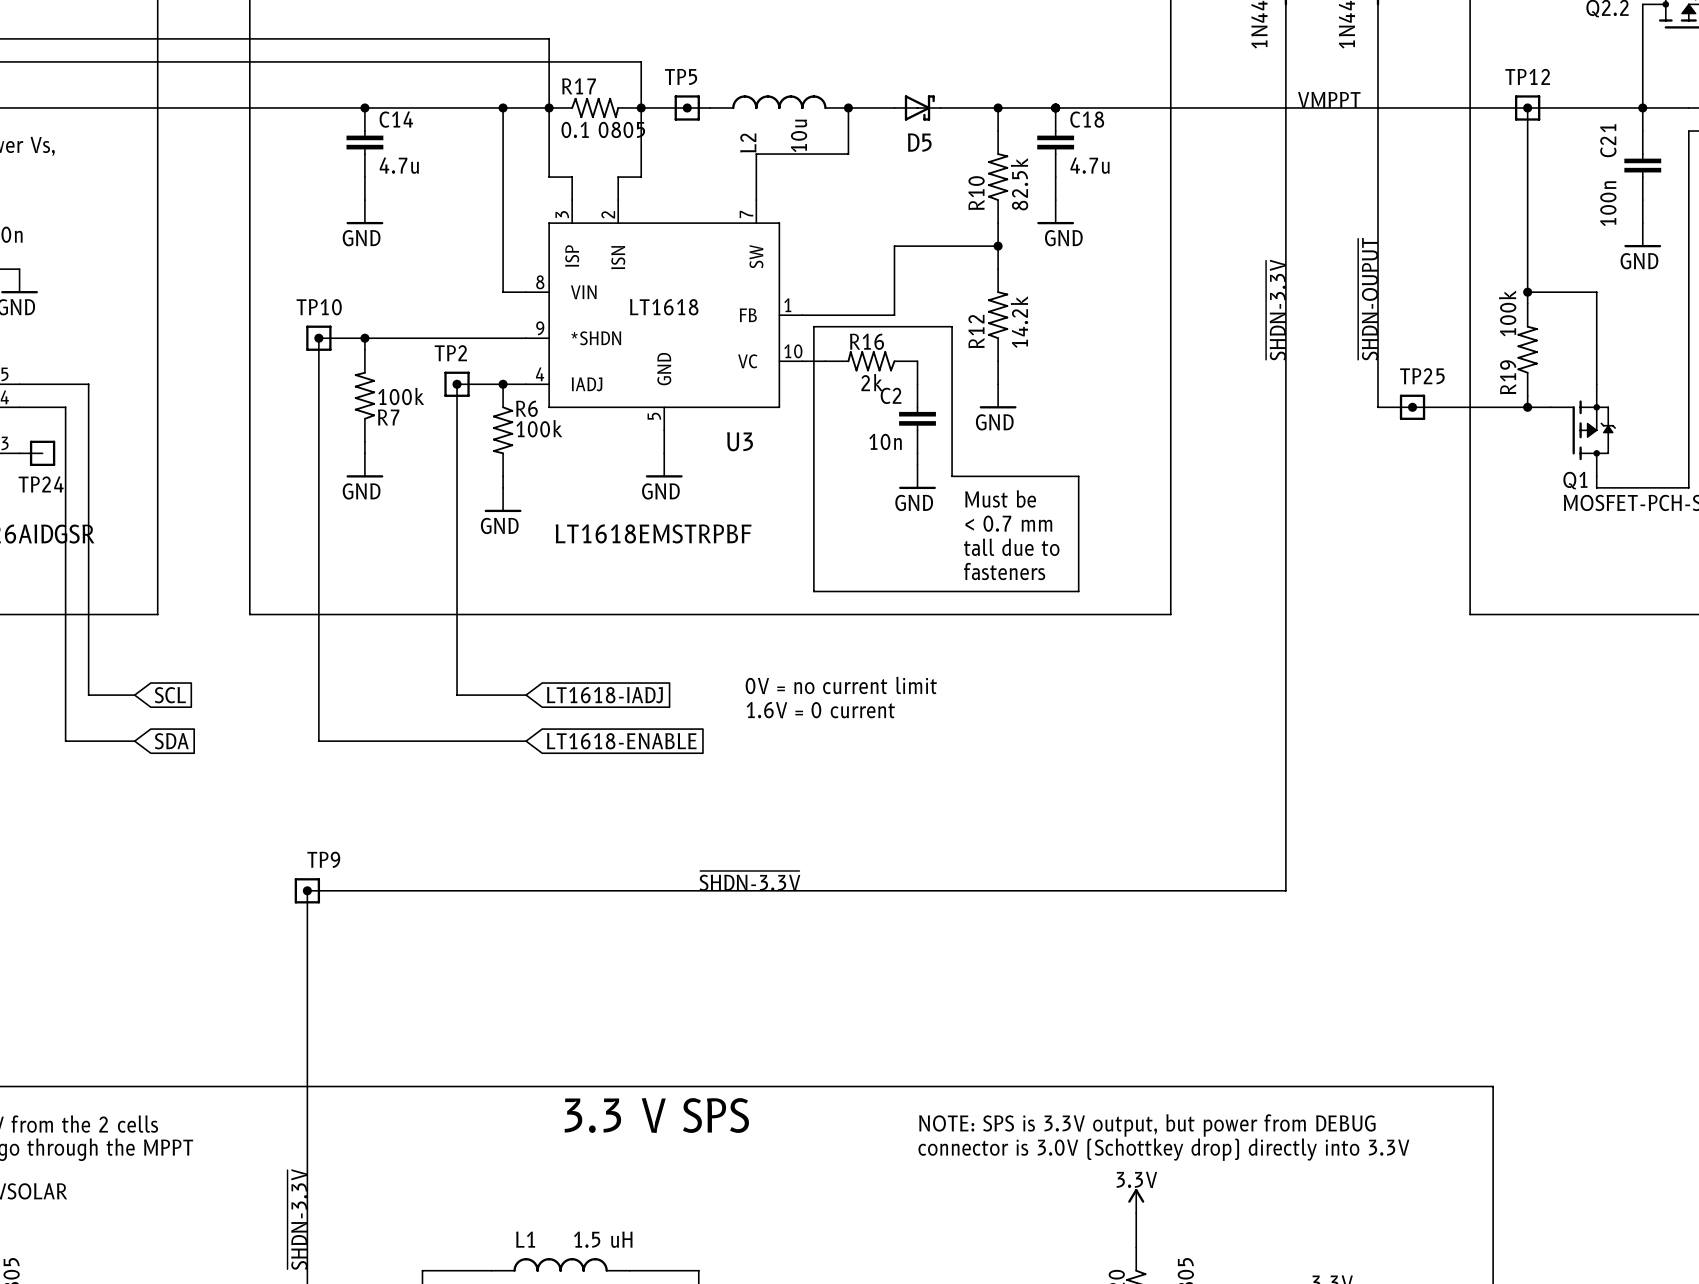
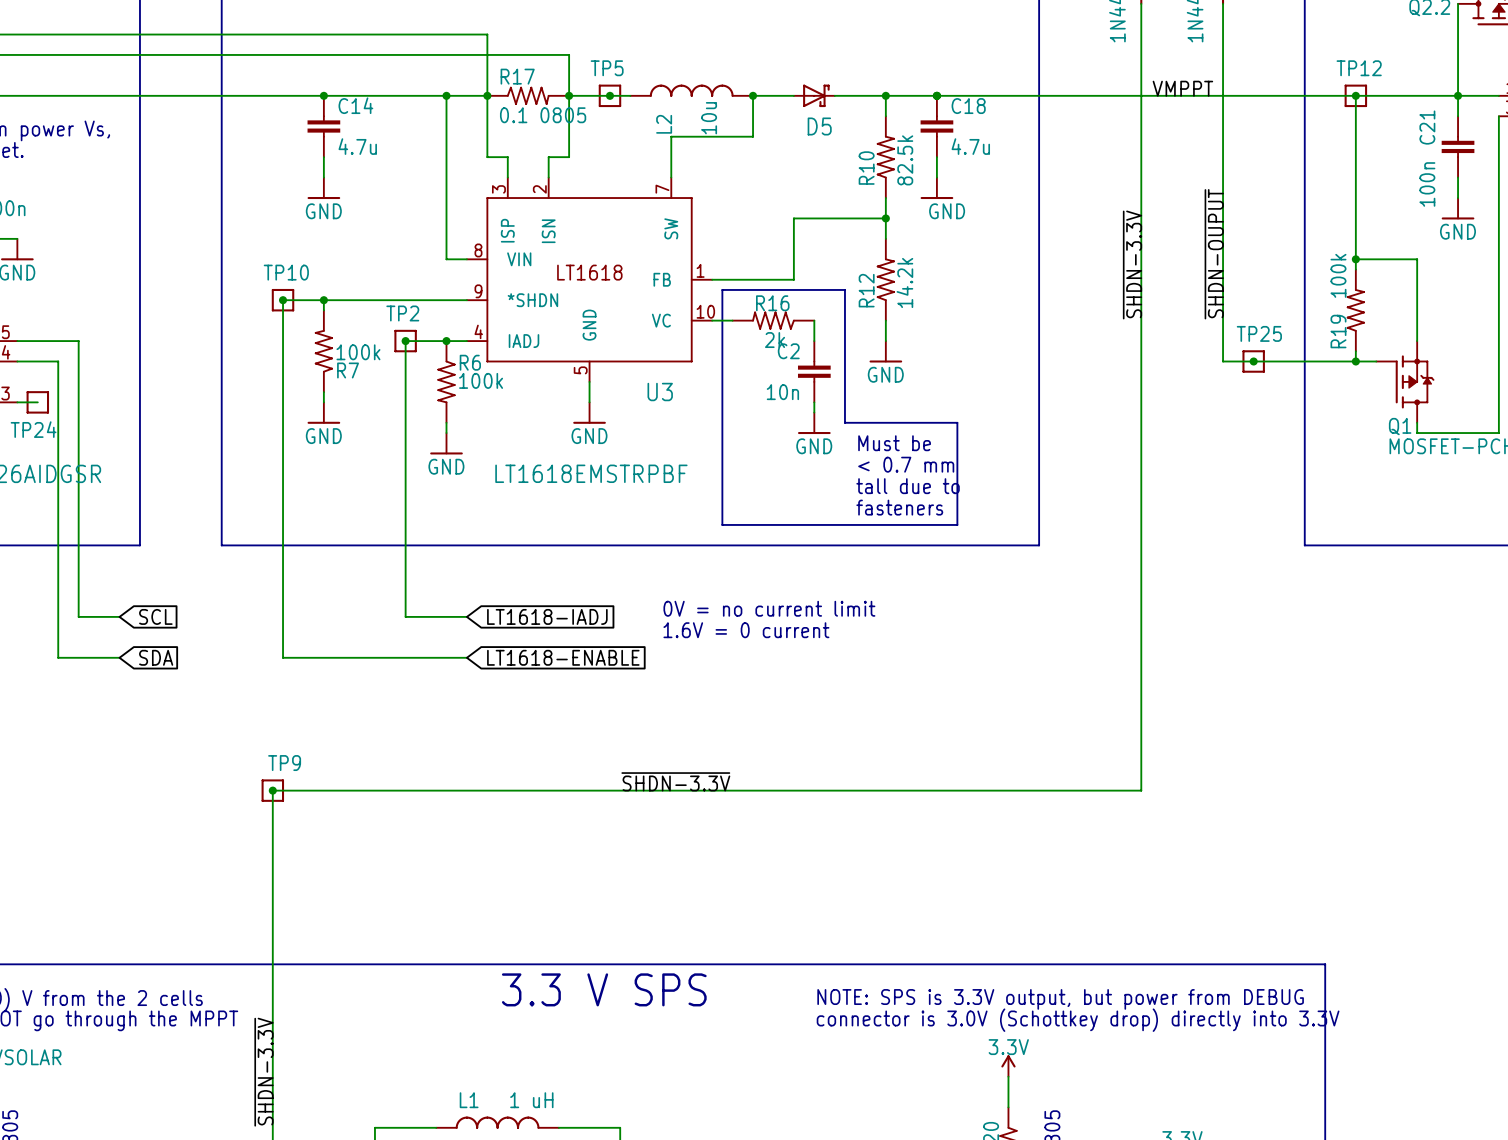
L1 value: 1.5 uH (603, 1239) -> 1 uH (531, 1100)

